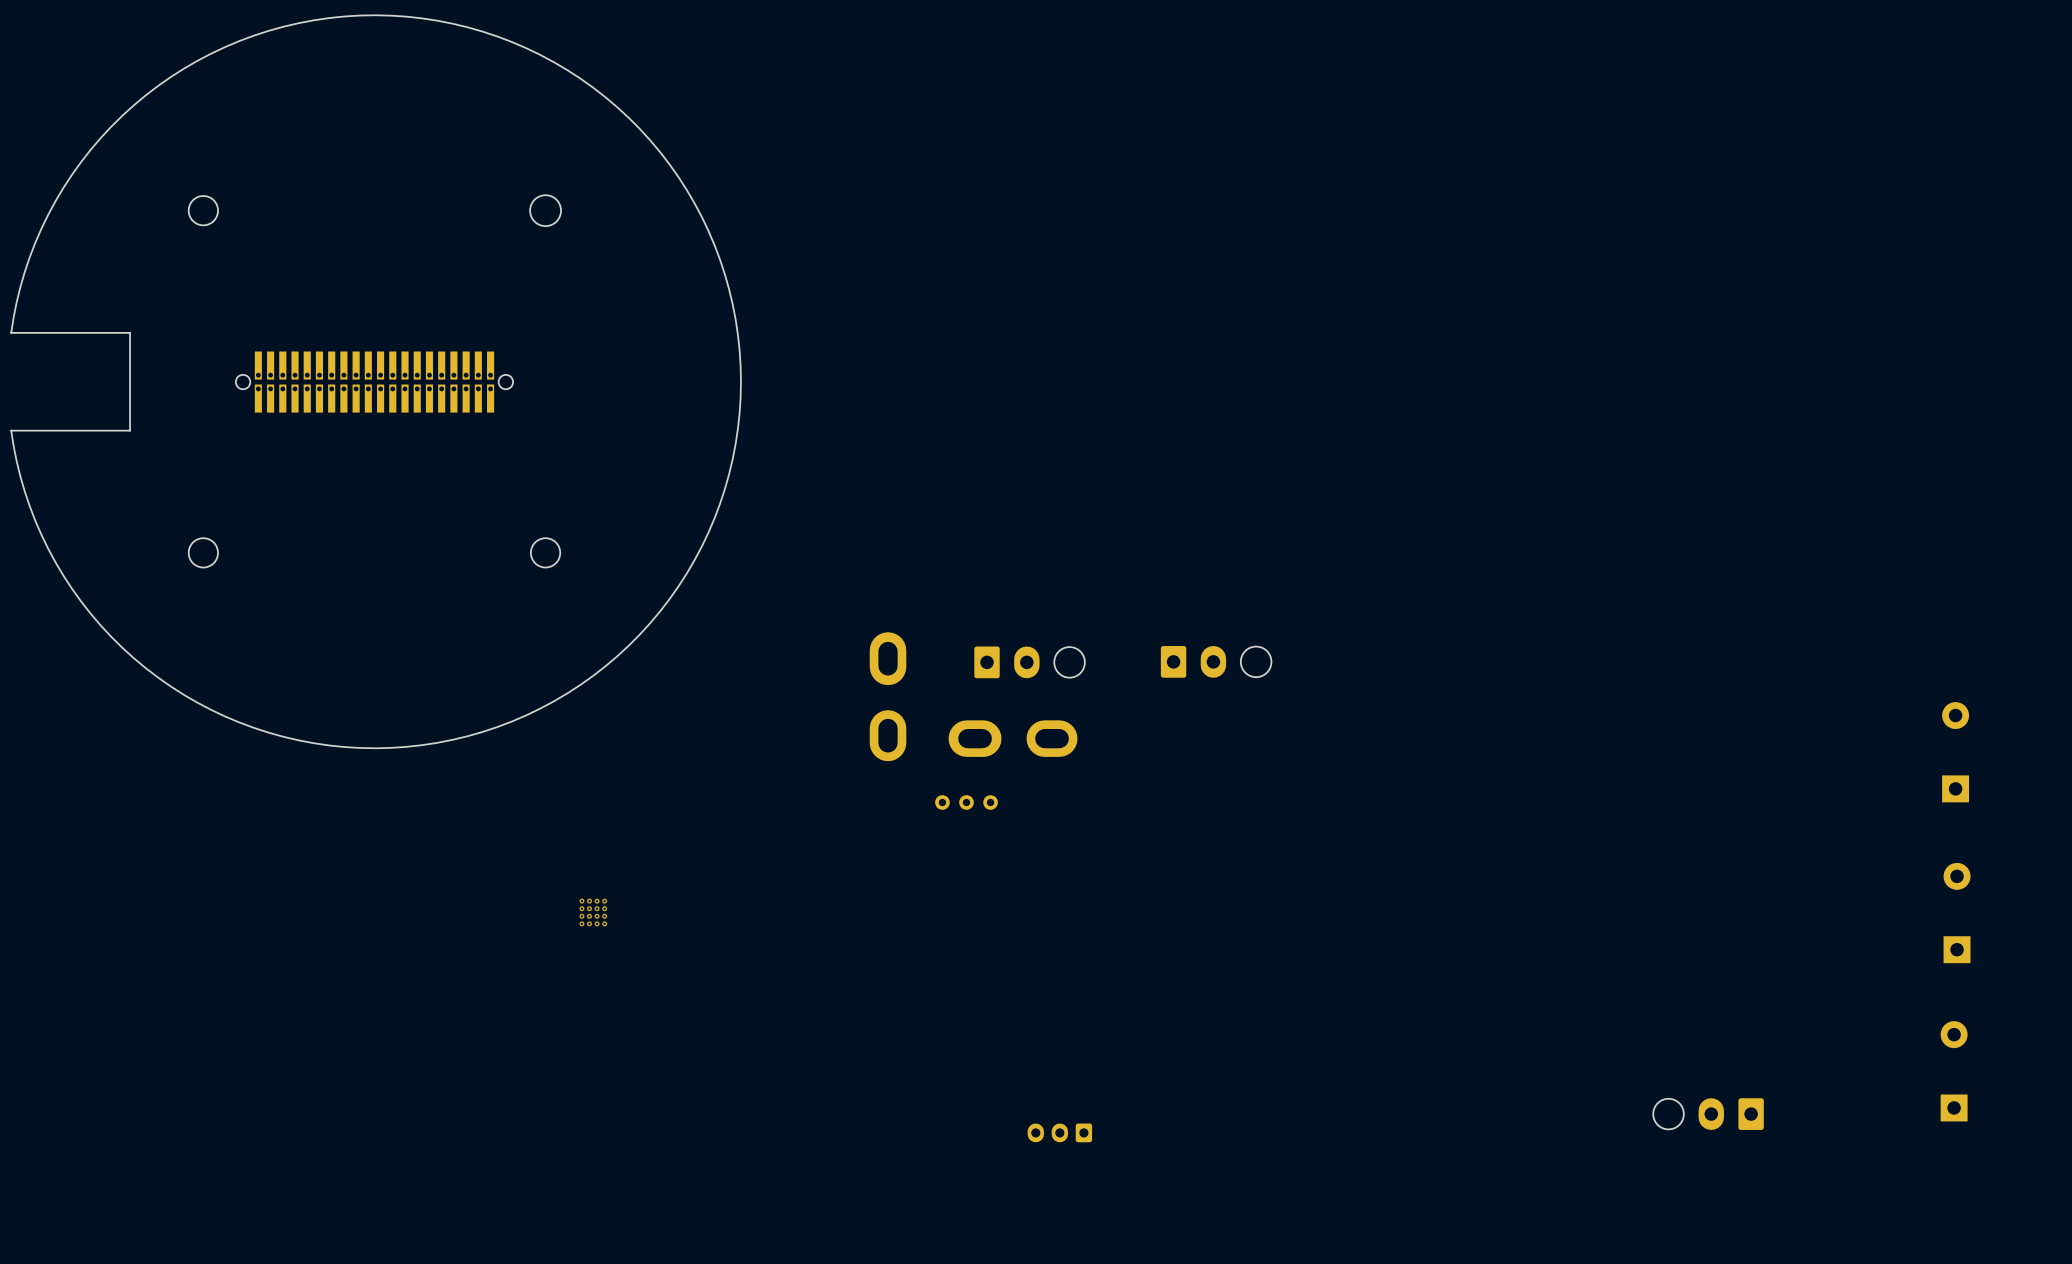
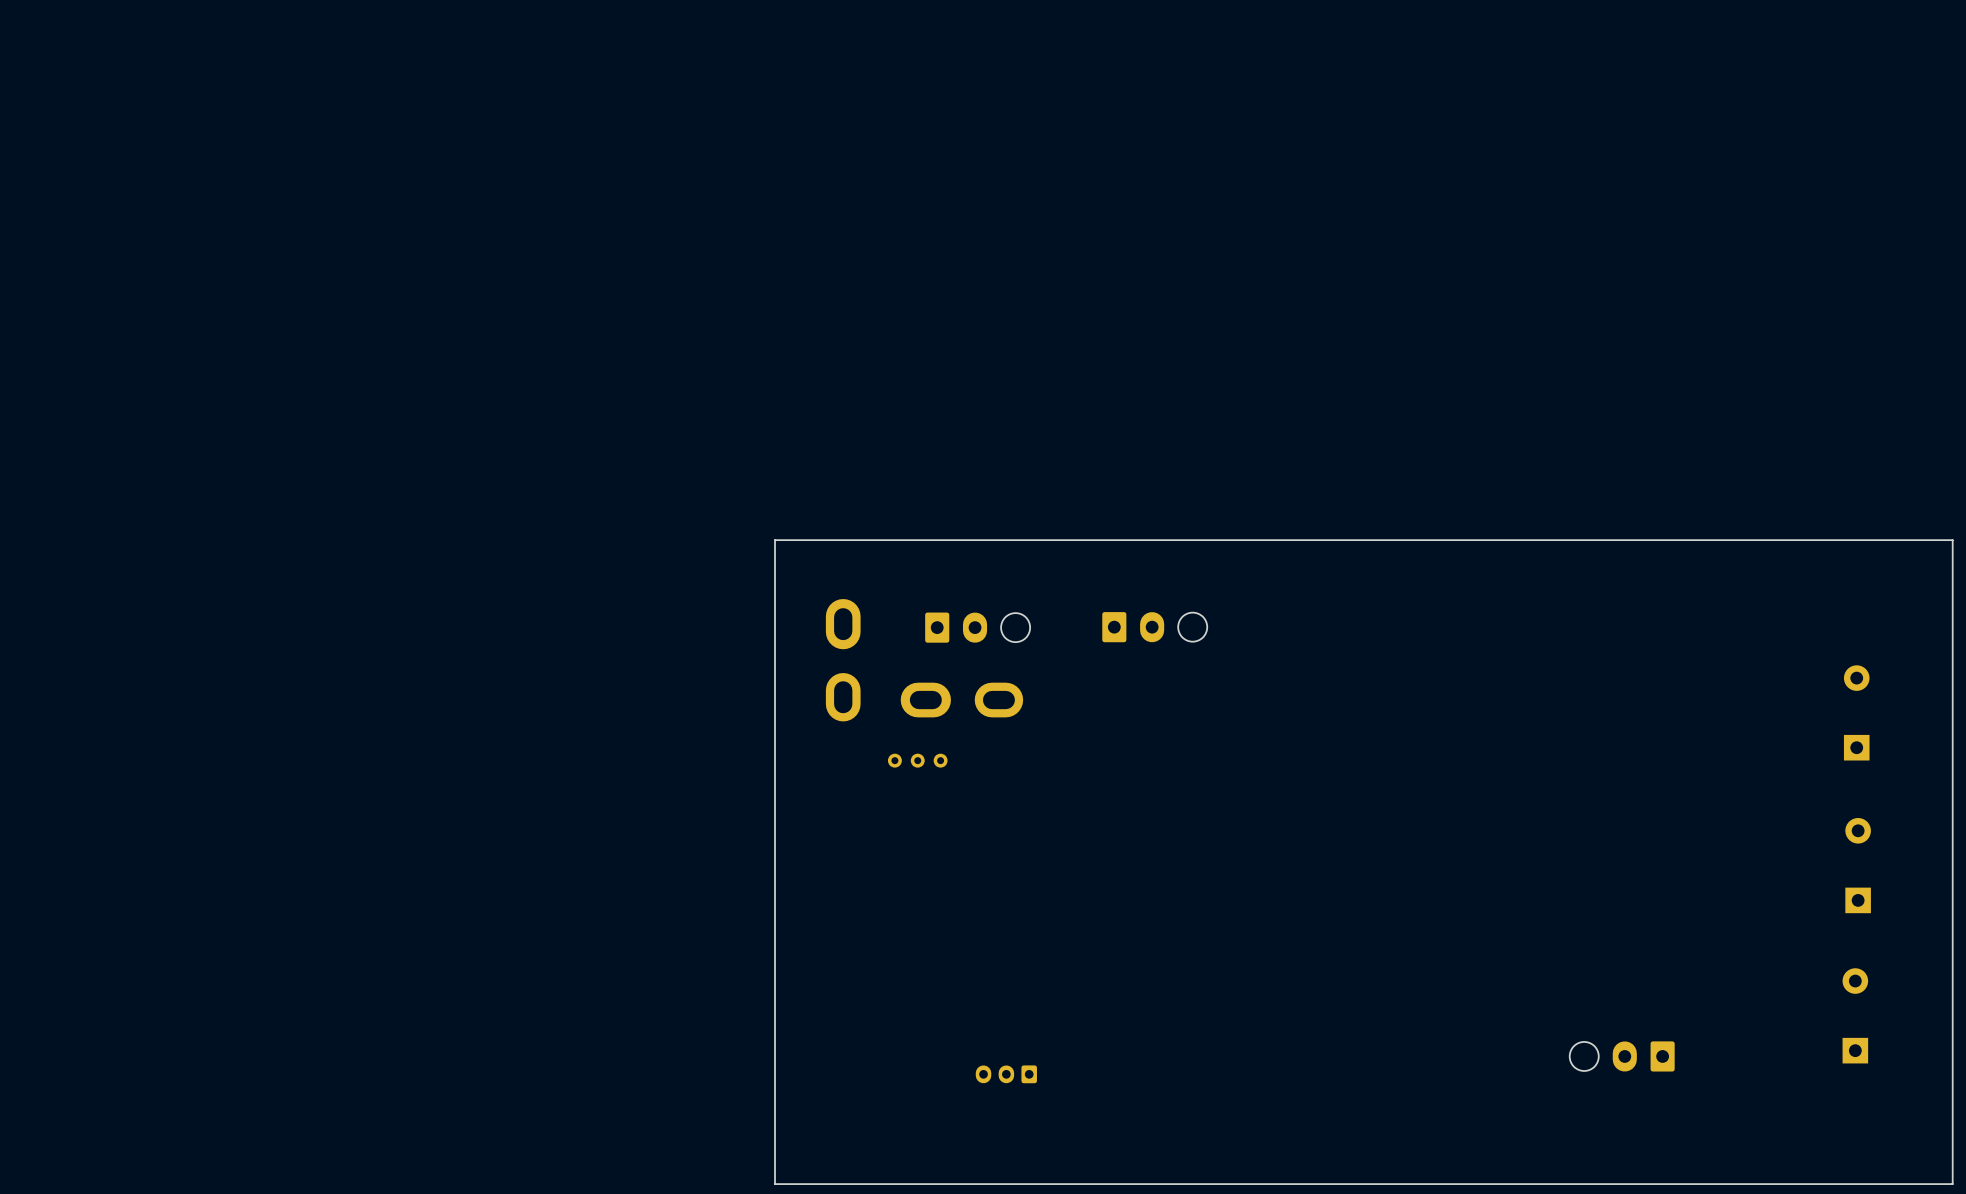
round board edge: [529, 194, 562, 227] -> none
round board edge: [188, 195, 219, 226] -> none
board edge: (130, 332) (11, 332) (24, 272) (48, 214) (80, 162) (122, 115) (157, 86) (197, 61) (239, 41) (283, 26) (313, 20) (360, 15) (406, 16) (452, 23) (497, 36) (526, 48) (580, 78) (617, 107) (639, 128) (659, 151) (686, 189) (708, 231) (720, 259) (735, 319) (740, 381) (738, 428) (732, 458) (724, 488) (708, 532) (686, 573) (669, 599) (649, 623) (617, 656) (567, 693) (526, 715) (497, 727) (437, 742) (375, 748) (344, 747) (298, 740) (268, 732) (224, 716) (183, 694) (145, 668) (111, 636) (80, 601) (55, 562) (35, 520) (20, 476) (11, 430) (130, 430) (130, 332) -> none
part: (374, 382) -> none
round board edge: [188, 537, 219, 568] -> none
round board edge: [530, 537, 561, 568] -> none
board edge: none -> (1952, 540) (1952, 1184) (775, 1184) (775, 540) (1952, 540)
part: (593, 912) -> none

